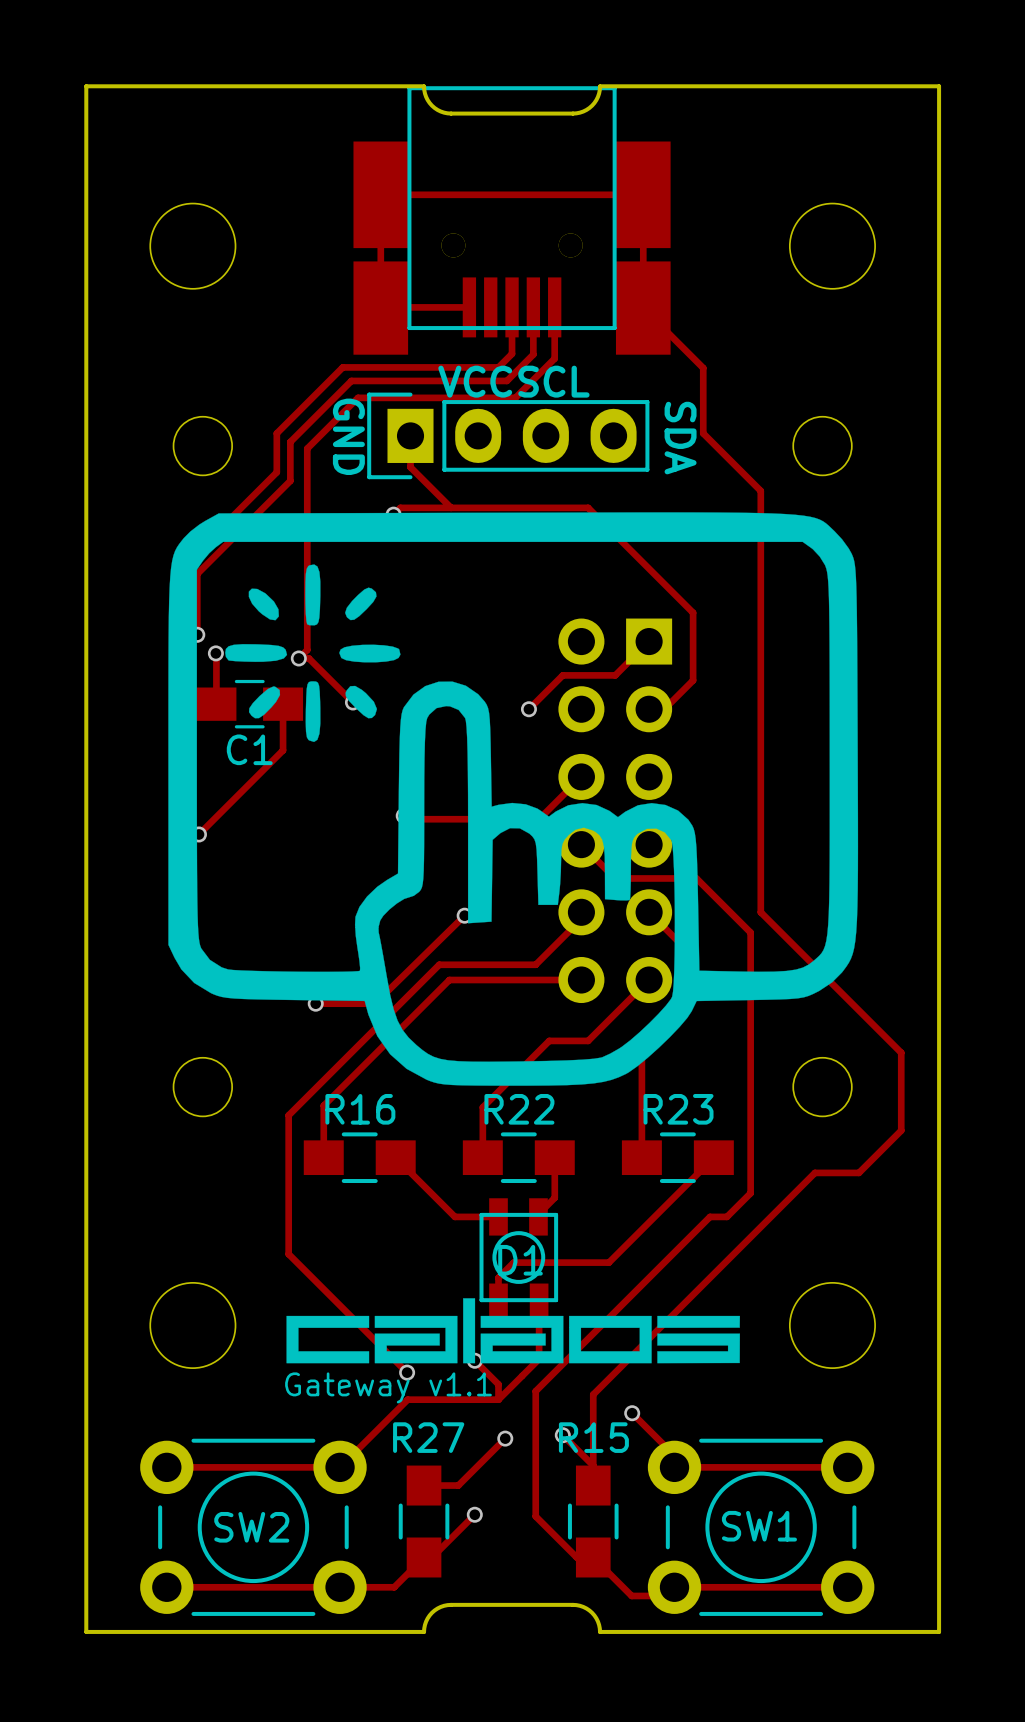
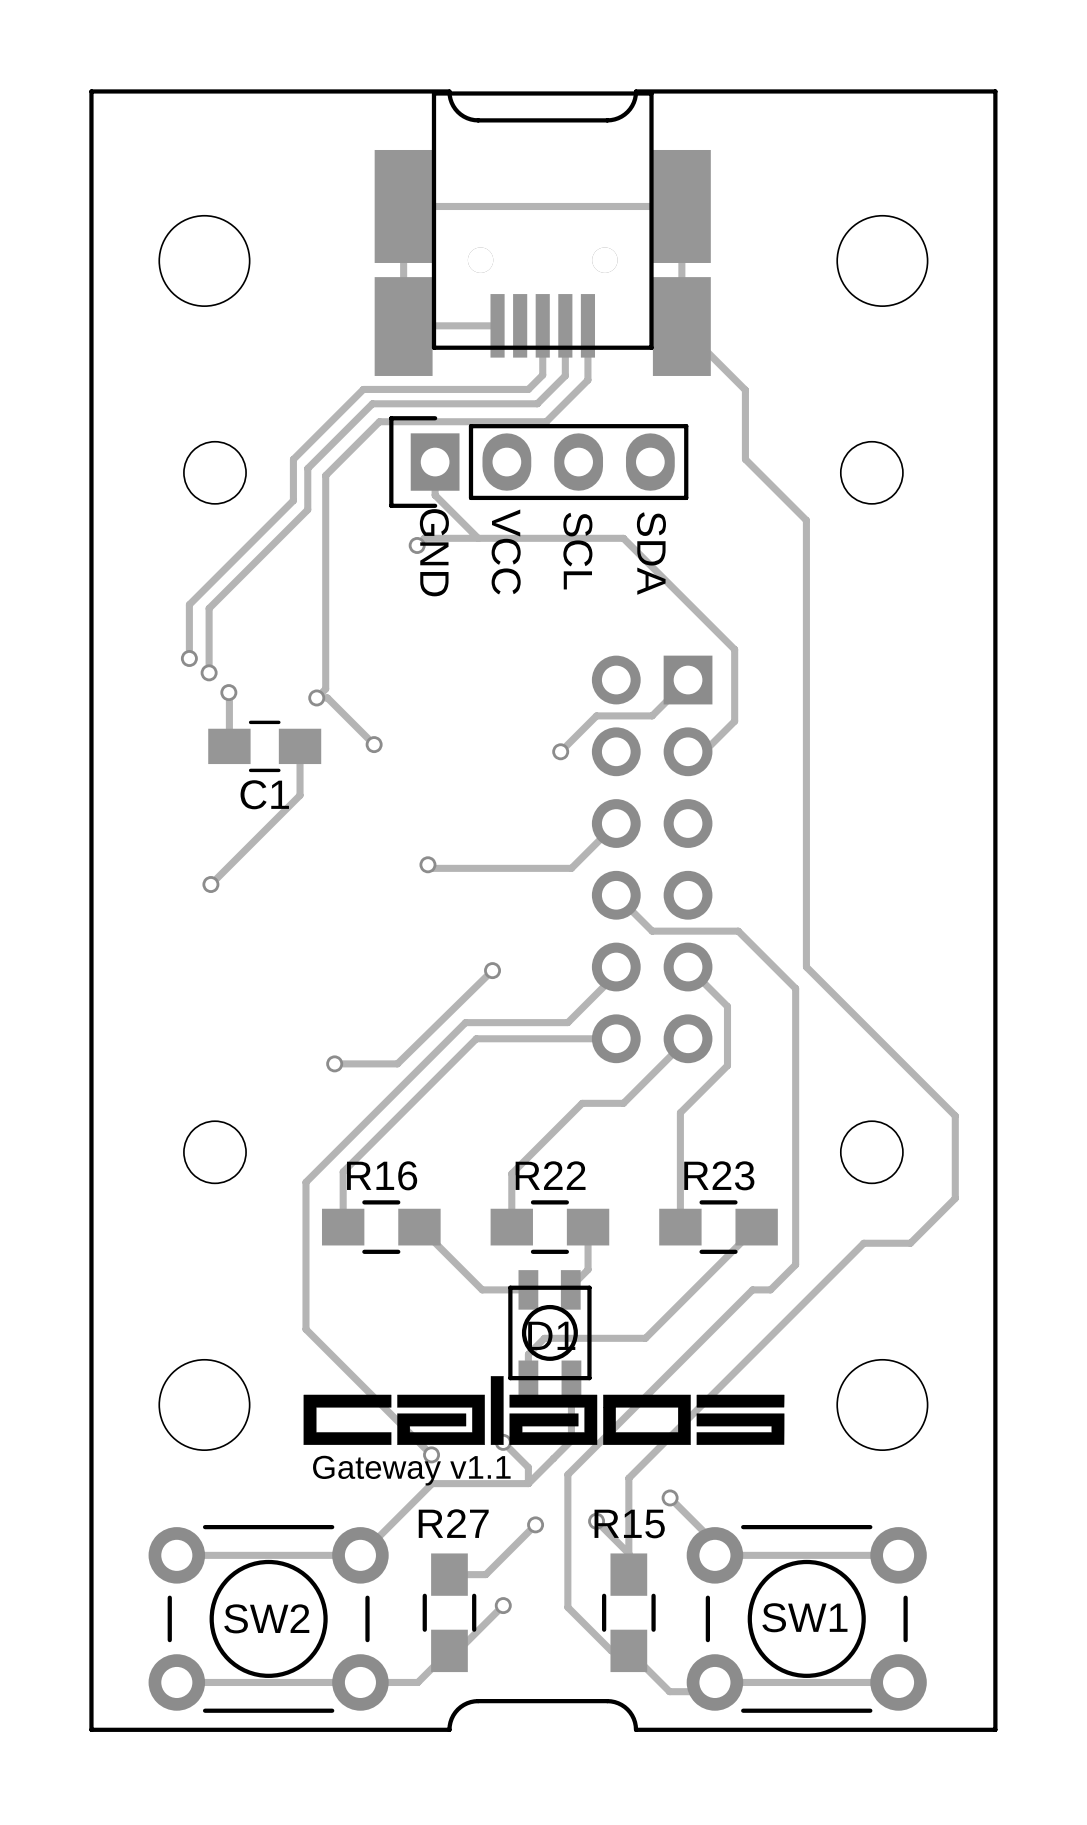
text rotation: 0° (475, 381) -> 90° clockwise (506, 551)
text position: VCC (475, 381) -> VCC (506, 551)
text rotation: 0° (553, 381) -> 90° clockwise (577, 551)
text position: SCL (553, 381) -> SCL (577, 551)
text position: GND (348, 436) -> GND (434, 552)
text position: SDA (680, 438) -> SDA (651, 553)
drawing: [168, 512, 859, 1086] -> none

